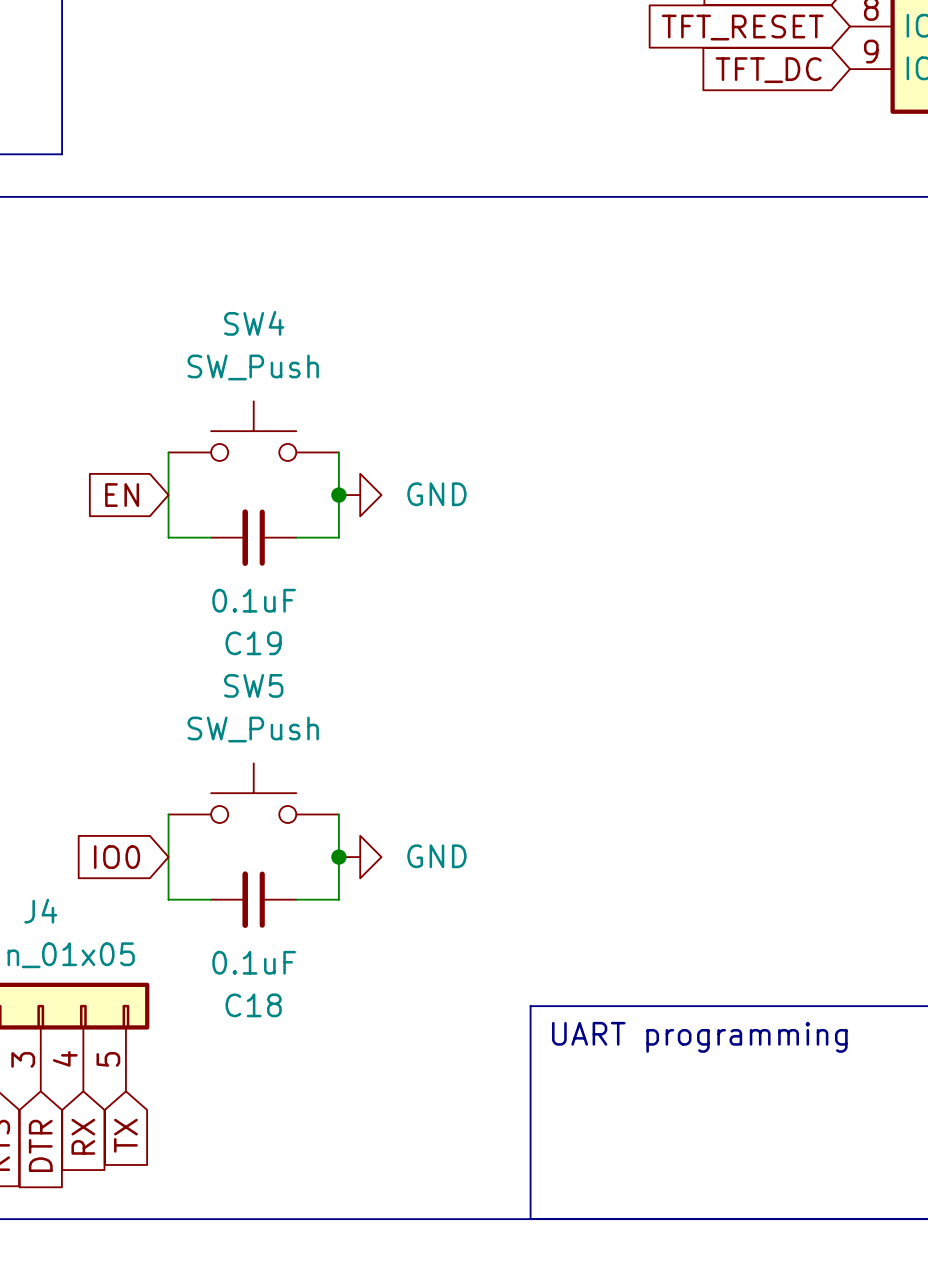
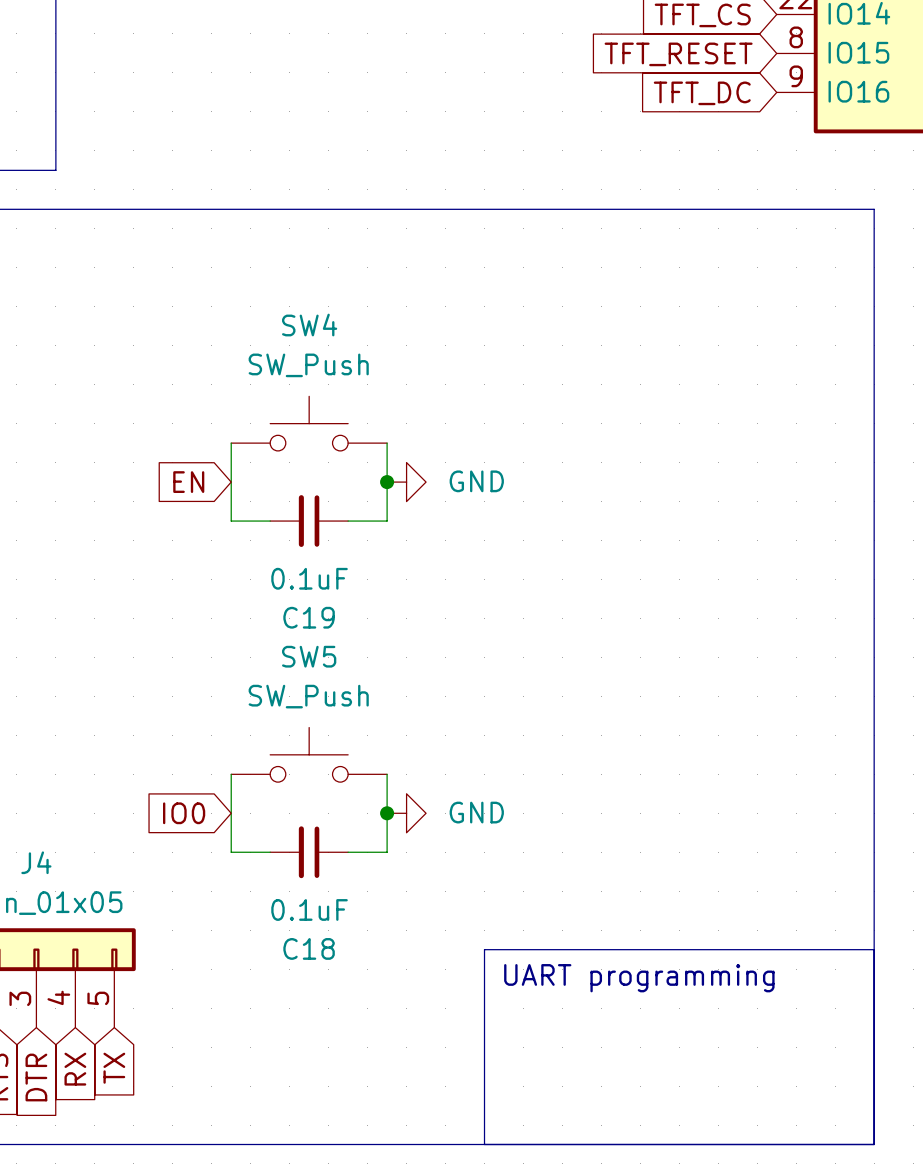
SW4 position: (253, 431) -> (309, 423)
wire: (168, 452) (168, 537) (211, 537) -> none
wire: (338, 452) (338, 537) (296, 537) -> (231, 443) (231, 521) (270, 521)
wire: none -> (387, 443) (387, 521) (348, 521)
global label position: EN (122, 495) -> EN (188, 482)
junction position: (338, 495) -> (387, 482)
power symbol position: GND (360, 495) -> GND (406, 482)
C19 position: (253, 537) -> (309, 521)
SW5 position: (253, 793) -> (309, 754)
wire: (168, 814) (168, 899) (211, 899) -> none
wire: (338, 814) (338, 899) (296, 899) -> (231, 774) (231, 852) (270, 852)
wire: none -> (387, 774) (387, 852) (348, 852)
global label position: IO0 (117, 857) -> IO0 (184, 813)
junction position: (338, 857) -> (387, 813)
power symbol position: GND (360, 857) -> GND (406, 813)
C18 position: (253, 899) -> (309, 852)

